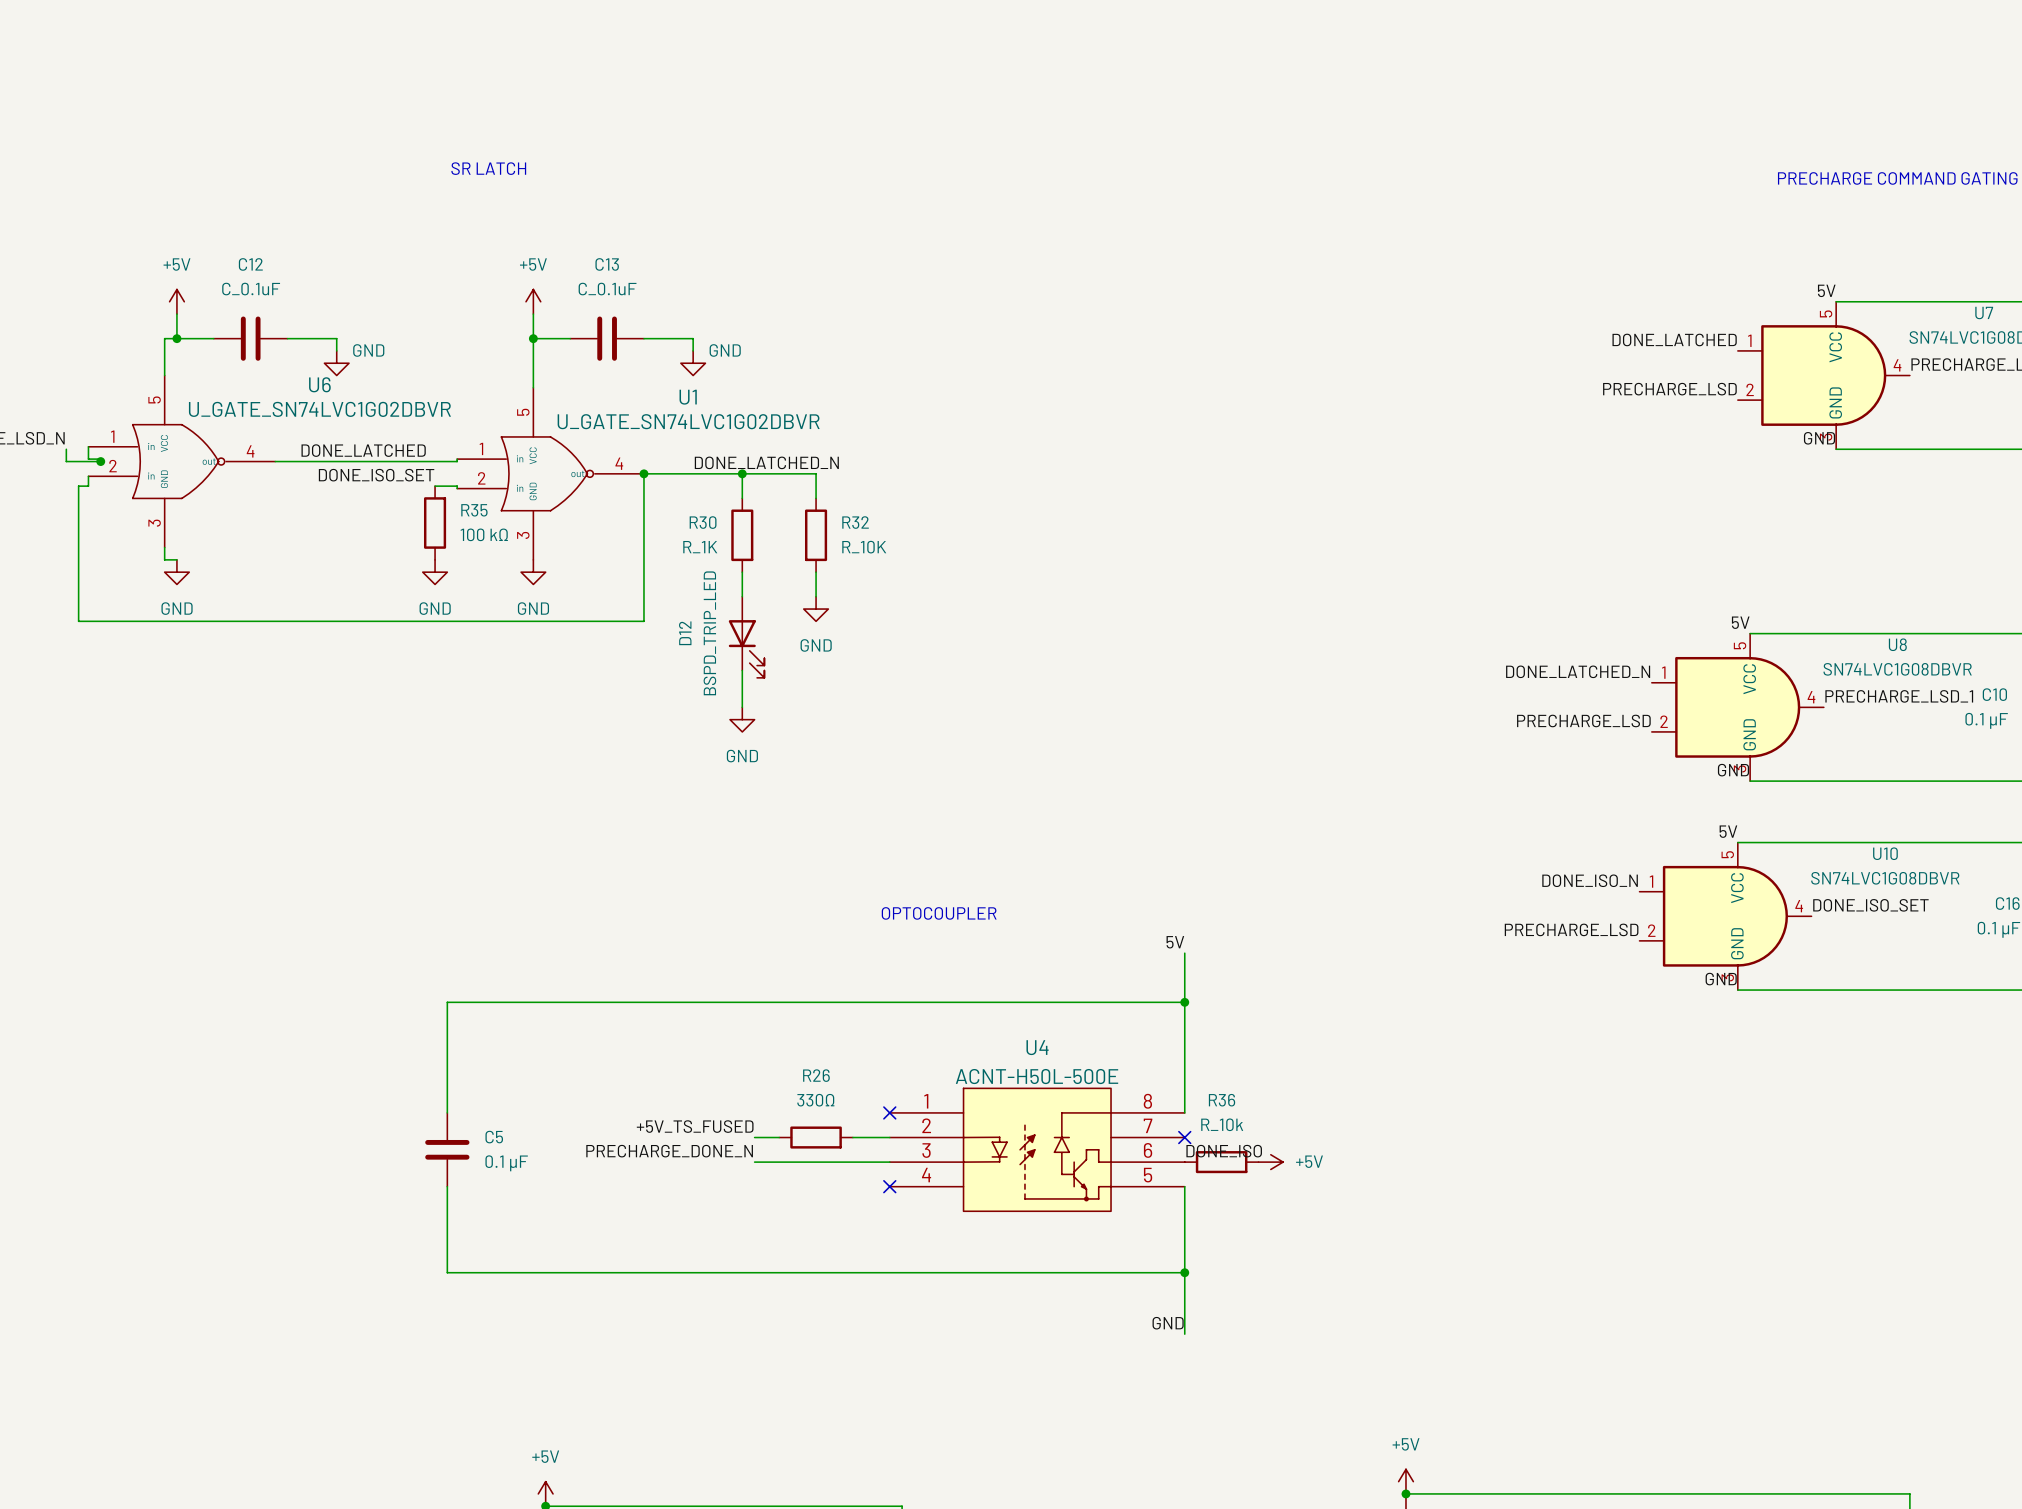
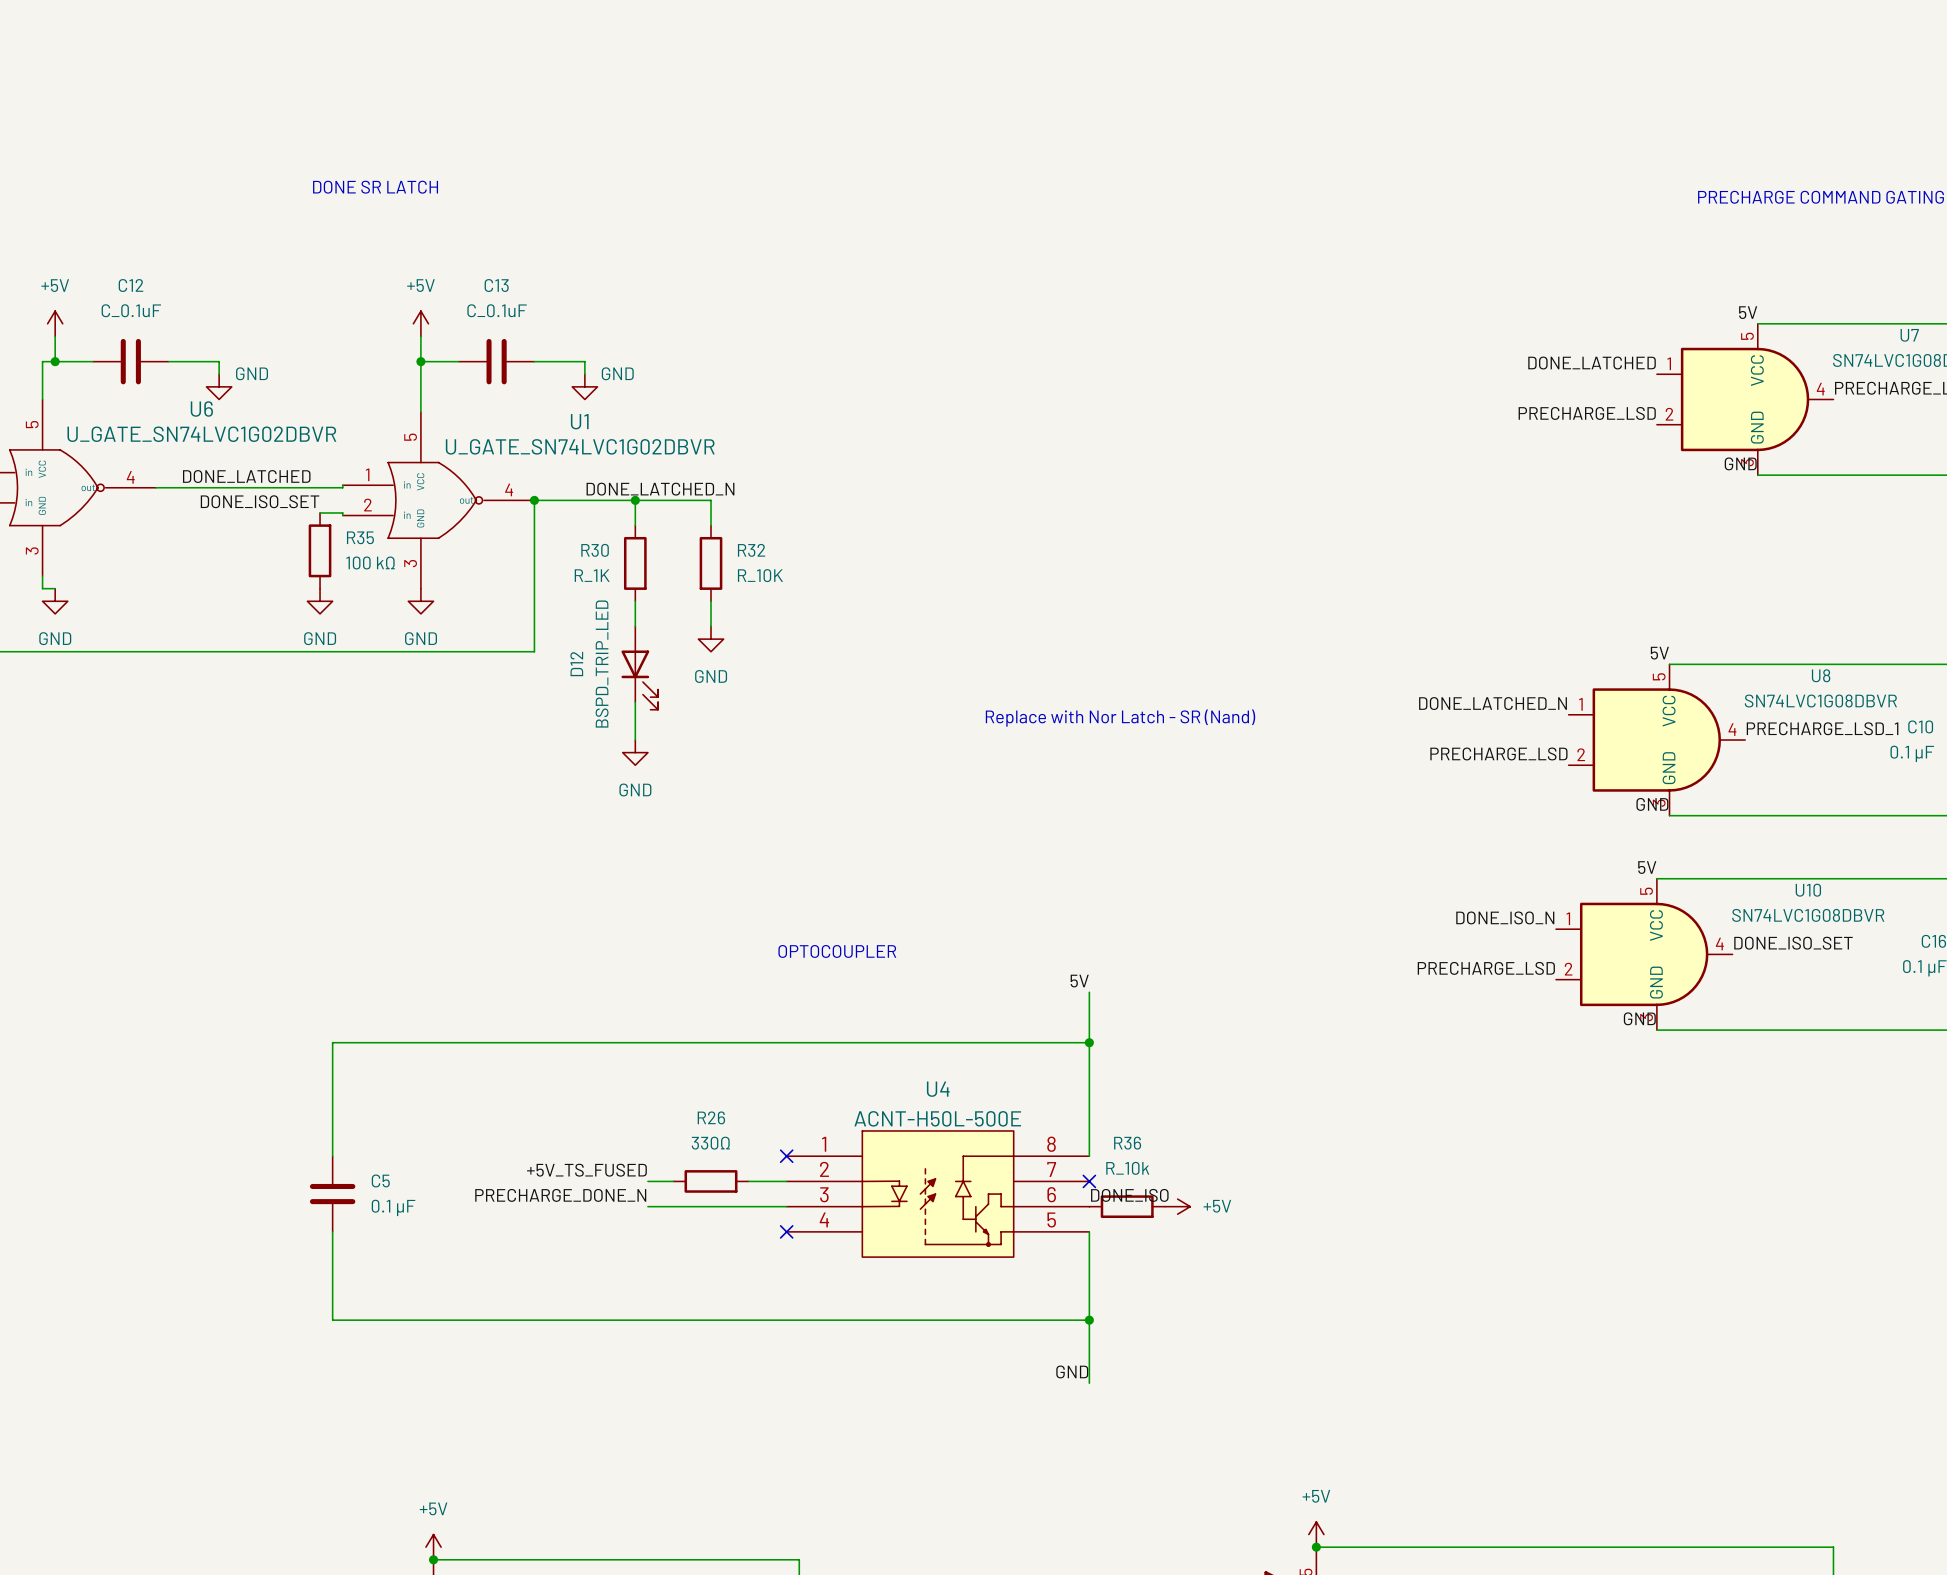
text: SR LATCH (488, 168) -> DONE SR LATCH (375, 187)
text: none -> Replace with Nor Latch - SR (Nand) (1120, 718)

